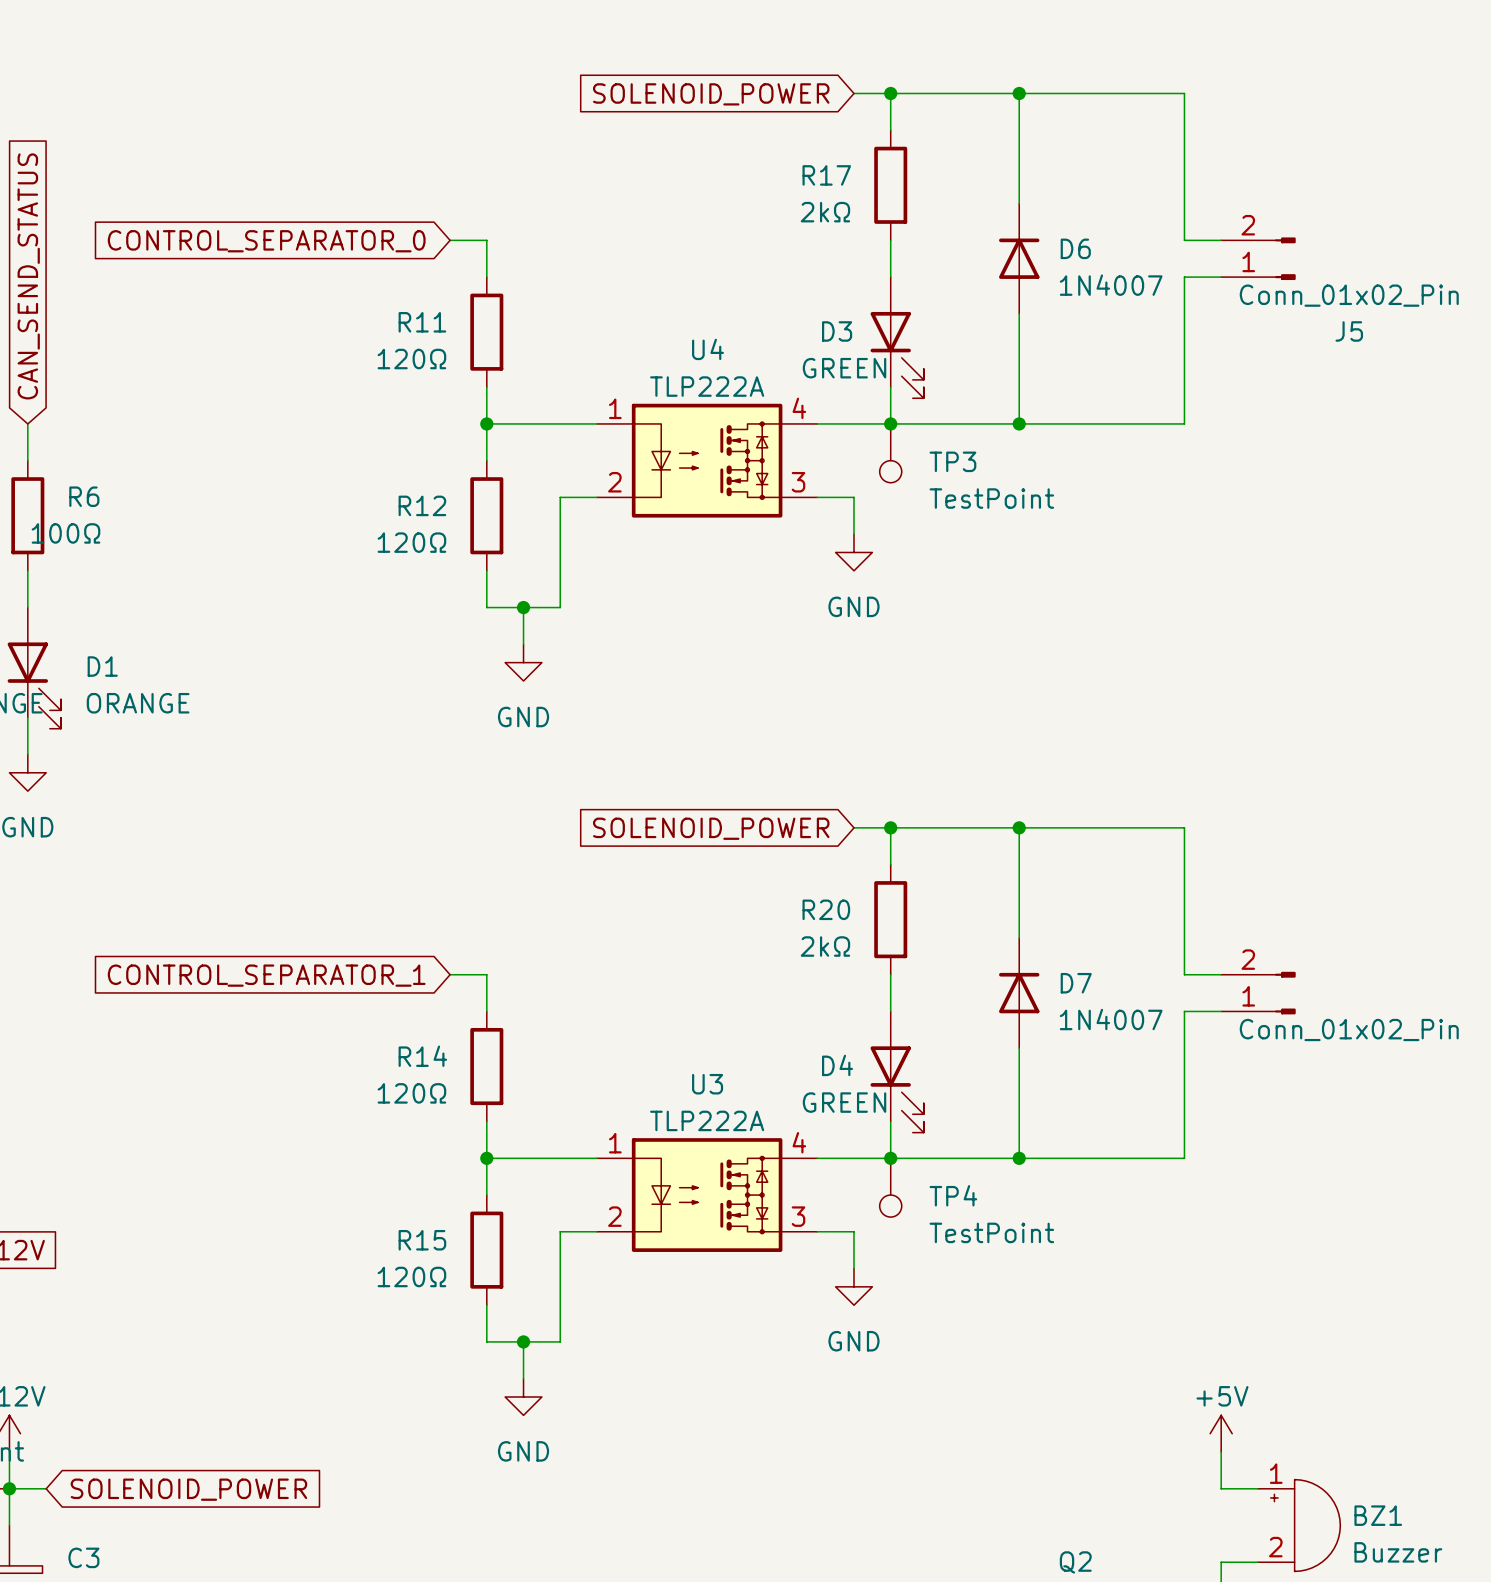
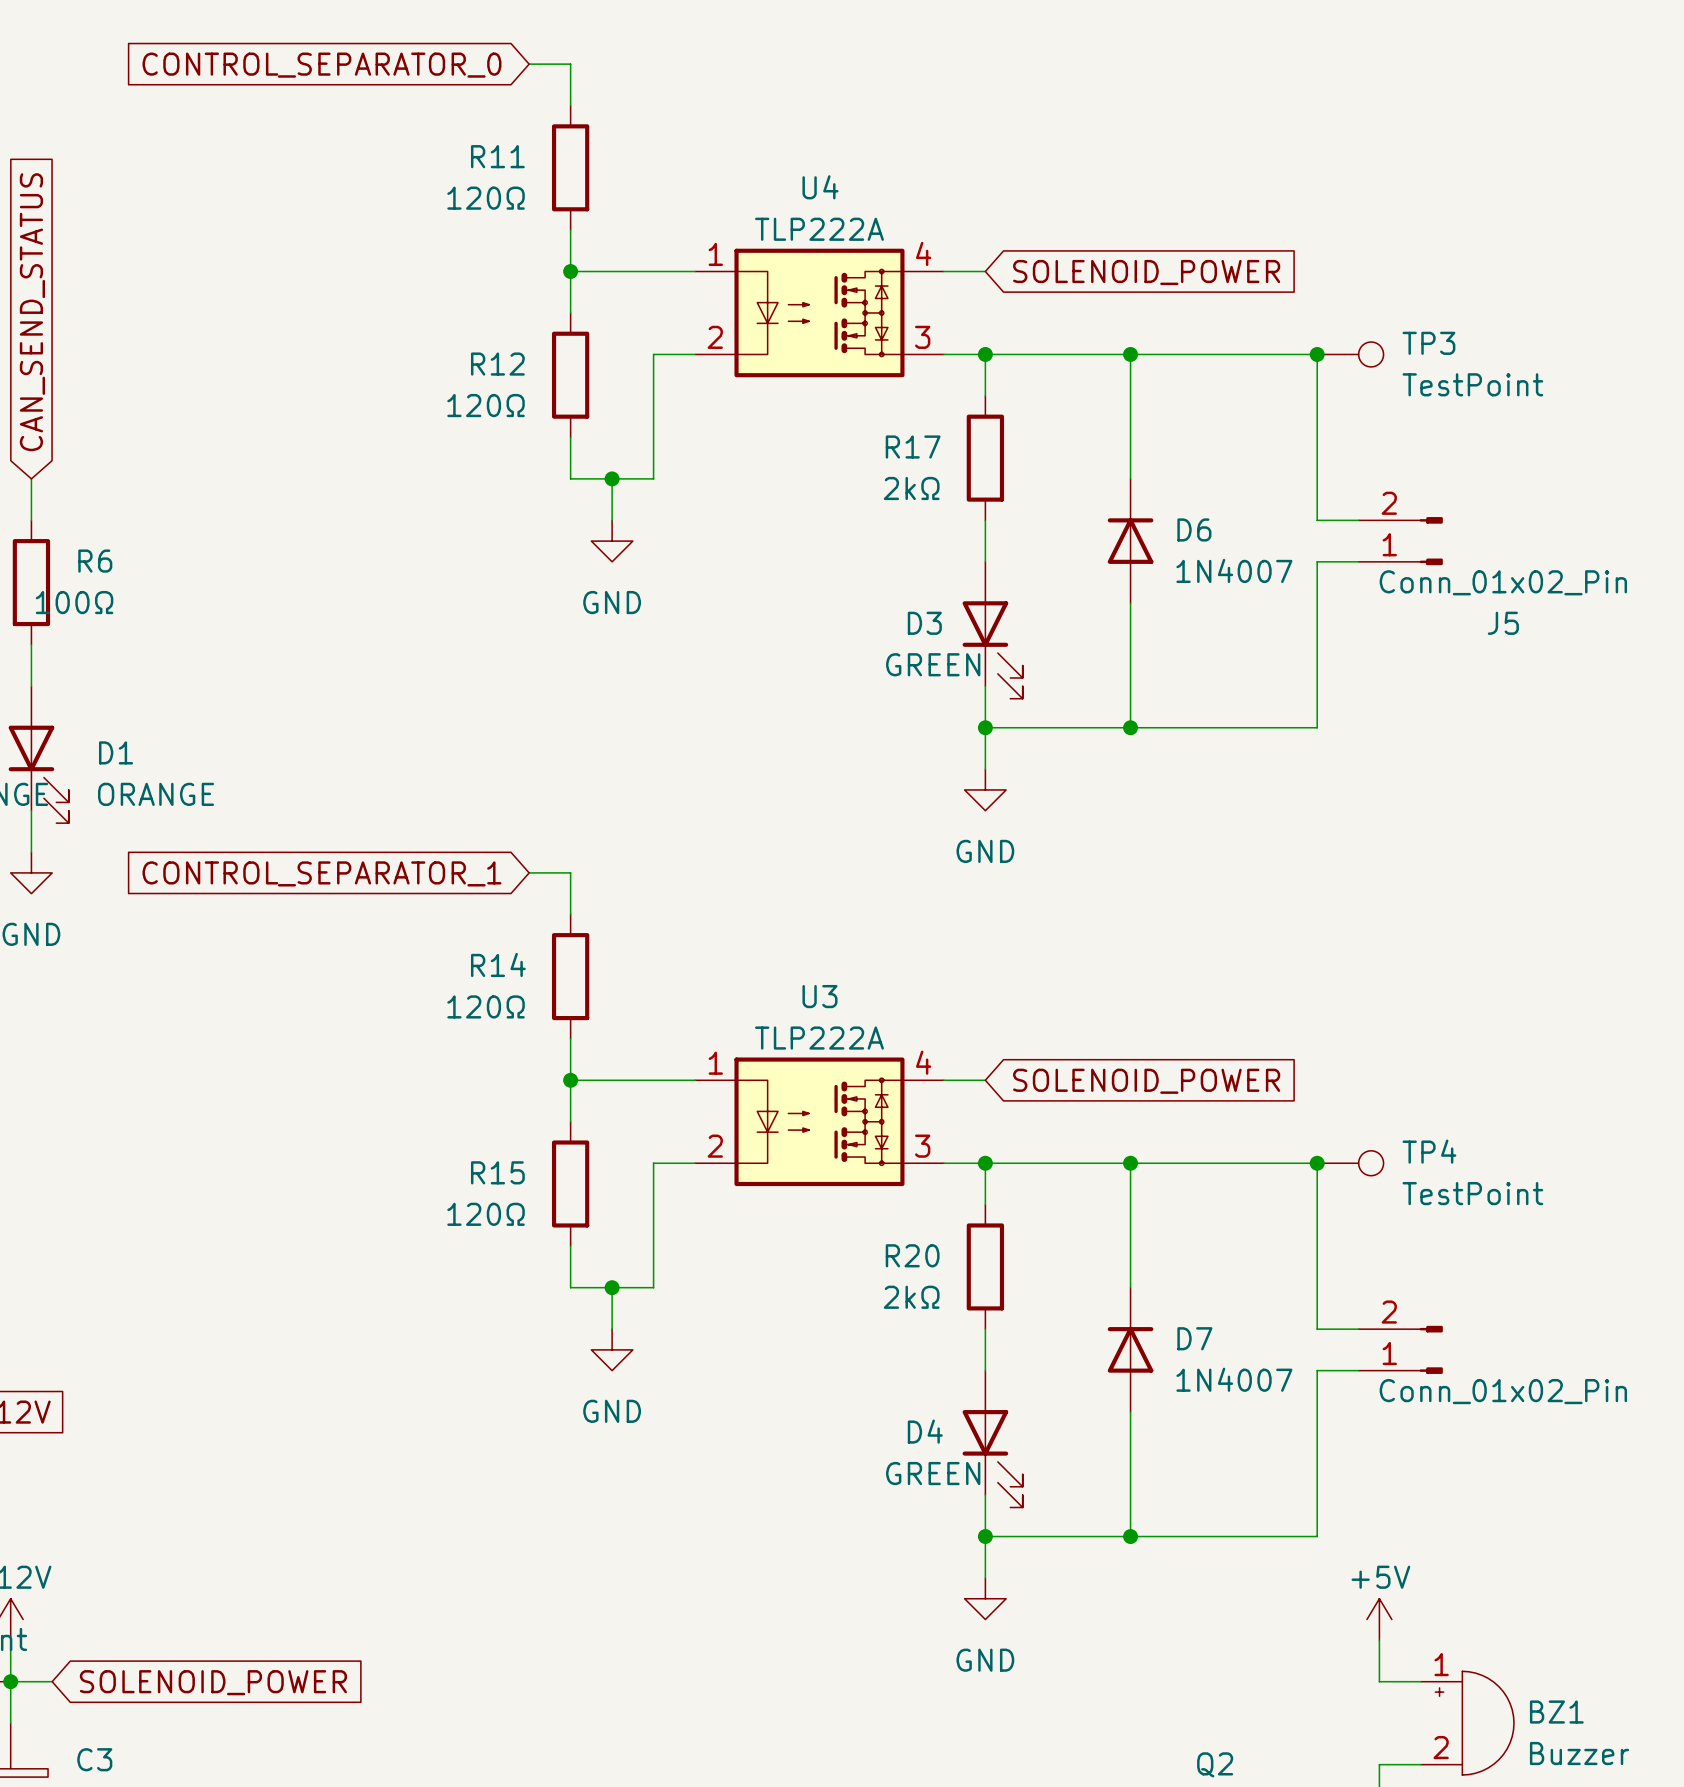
wire: (853, 93) (1184, 93) (1184, 240) (1221, 240) -> (943, 354) (1317, 354) (1317, 520) (1358, 520)
wire: (890, 93) (890, 130) -> (985, 354) (985, 395)
junction: (890, 93) -> none
wire: (1019, 93) (1019, 203) -> (1130, 354) (1130, 478)
junction: (1019, 93) -> none
global label rotation: 0° (711, 94) -> 180° (1146, 272)
global label position: SOLENOID_POWER (711, 94) -> SOLENOID_POWER (1146, 272)
R17 position: (890, 185) -> (985, 458)
wire: (450, 240) (486, 240) (486, 277) -> (529, 64) (570, 64) (570, 105)
wire: none -> (570, 271) (695, 271)
junction: none -> (570, 271)
wire: none -> (943, 271) (985, 271)
wire: (890, 240) (890, 277) -> (985, 520) (985, 561)
global label position: CONTROL_SEPARATOR_0 (266, 241) -> CONTROL_SEPARATOR_0 (321, 65)
D6 position: (1019, 258) -> (1130, 541)
J5 position: (1258, 258) -> (1400, 541)
wire: (1221, 277) (1184, 277) (1184, 423) (817, 423) -> none
junction: none -> (985, 354)
junction: none -> (1130, 354)
wire: (1019, 313) (1019, 423) -> (1130, 603) (1130, 727)
junction: none -> (1317, 354)
R11 position: (486, 332) -> (570, 167)
D3 position: (897, 337) -> (992, 630)
wire: (486, 387) (486, 460) -> (570, 230) (570, 312)
wire: (890, 387) (890, 423) -> none
wire: (486, 423) (505, 423) -> (570, 437) (570, 478)
junction position: (486, 423) -> (612, 478)
wire: (578, 423) (596, 423) -> (653, 478) (653, 354) (695, 354)
junction: (890, 423) -> none
junction: (1019, 423) -> none
TP3 position: (890, 453) -> (1350, 354)
U4 position: (707, 460) -> (819, 312)
TP3 rotation: 0° (890, 471) -> 90° counterclockwise (1371, 354)
power symbol: none -> GND (612, 541)
wire: (596, 497) (560, 497) (560, 607) (486, 607) (486, 570) -> none
wire: (817, 497) (853, 497) (853, 534) -> none
wire: none -> (1358, 561) (1317, 561) (1317, 727) (985, 727)
R12 position: (486, 515) -> (570, 375)
power symbol position: GND (853, 552) -> GND (985, 789)
wire: (523, 607) (523, 644) -> (612, 478) (612, 520)
junction: (523, 607) -> none
wire: none -> (985, 686) (985, 769)
junction: none -> (985, 727)
junction: none -> (1130, 727)
power symbol: GND (523, 662) -> none
wire: (853, 827) (1184, 827) (1184, 974) (1221, 974) -> (943, 1163) (1317, 1163) (1317, 1329) (1358, 1329)
wire: (890, 827) (890, 864) -> (985, 1163) (985, 1204)
junction: (890, 827) -> none
wire: (1019, 827) (1019, 938) -> (1130, 1163) (1130, 1287)
junction: (1019, 827) -> none
global label rotation: 0° (711, 828) -> 180° (1146, 1081)
global label position: SOLENOID_POWER (711, 828) -> SOLENOID_POWER (1146, 1081)
R20 position: (890, 919) -> (985, 1266)
junction: none -> (570, 1080)
wire: none -> (943, 1080) (985, 1080)
wire: (450, 974) (486, 974) (486, 1011) -> (529, 872) (570, 872) (570, 914)
wire: (890, 974) (890, 1011) -> (985, 1329) (985, 1370)
global label position: CONTROL_SEPARATOR_1 (266, 975) -> CONTROL_SEPARATOR_1 (321, 873)
D7 position: (1019, 993) -> (1130, 1349)
part position: (1258, 993) -> (1400, 1349)
wire: (1221, 1011) (1184, 1011) (1184, 1158) (817, 1158) -> none
junction: none -> (985, 1163)
junction: none -> (1130, 1163)
junction: none -> (1317, 1163)
wire: (1019, 1048) (1019, 1158) -> (1130, 1412) (1130, 1536)
R14 position: (486, 1066) -> (570, 976)
D4 position: (897, 1072) -> (992, 1439)
wire: (486, 1121) (486, 1195) -> (570, 1038) (570, 1121)
wire: (890, 1121) (890, 1158) -> none
wire: (486, 1158) (596, 1158) -> (570, 1080) (695, 1080)
junction position: (486, 1158) -> (612, 1287)
junction: (890, 1158) -> none
junction: (1019, 1158) -> none
TP4 position: (890, 1187) -> (1350, 1163)
power symbol: none -> GND (612, 1349)
U3 position: (707, 1195) -> (819, 1121)
TP4 rotation: 0° (890, 1206) -> 90° counterclockwise (1371, 1163)
wire: none -> (1358, 1370) (1317, 1370) (1317, 1536) (985, 1536)
wire: (596, 1231) (560, 1231) (560, 1341) (486, 1341) (486, 1305) -> (695, 1163) (653, 1163) (653, 1287) (570, 1287) (570, 1246)
wire: (817, 1231) (853, 1231) (853, 1268) -> none
R15 position: (486, 1250) -> (570, 1183)
power symbol position: GND (853, 1286) -> GND (985, 1598)
wire: none -> (985, 1495) (985, 1578)
wire: (523, 1341) (523, 1378) -> (612, 1287) (612, 1329)
junction: (523, 1341) -> none
junction: none -> (985, 1536)
junction: none -> (1130, 1536)
power symbol: GND (523, 1397) -> none

